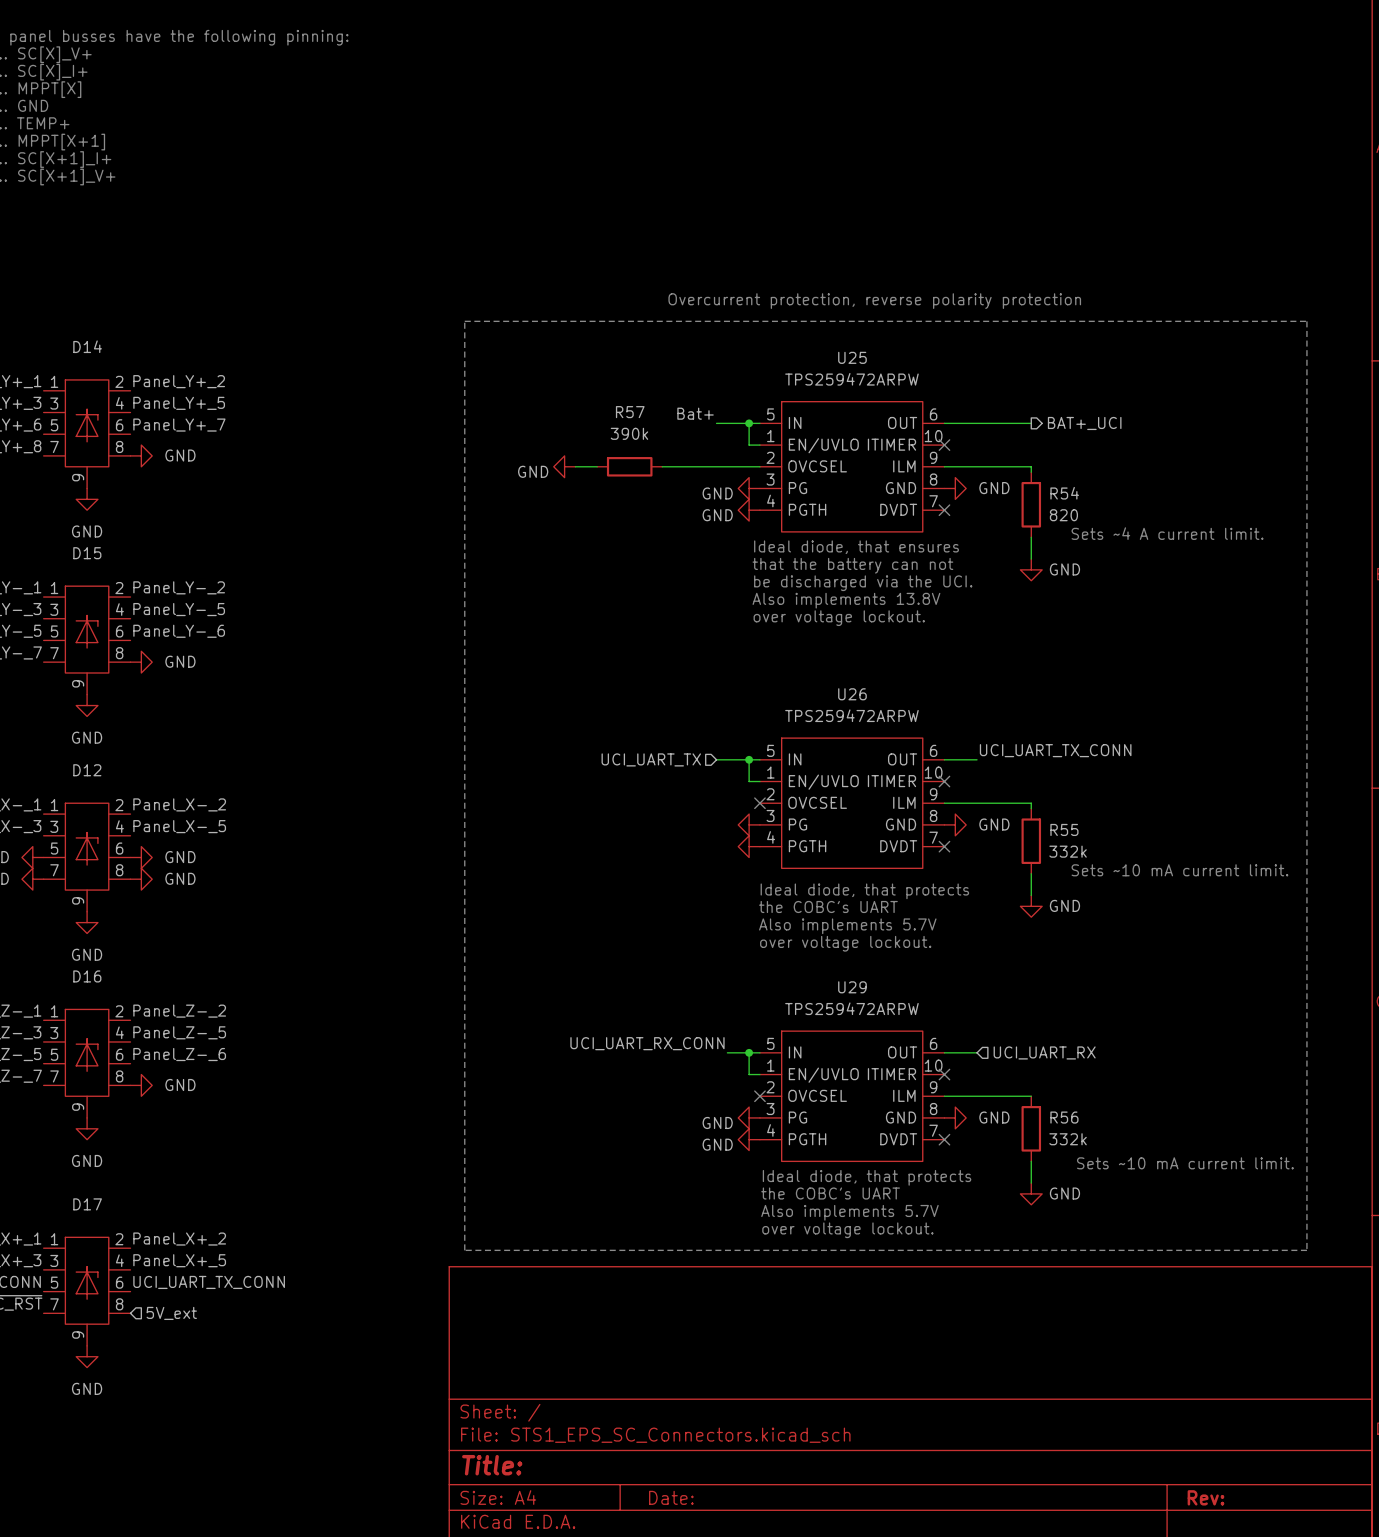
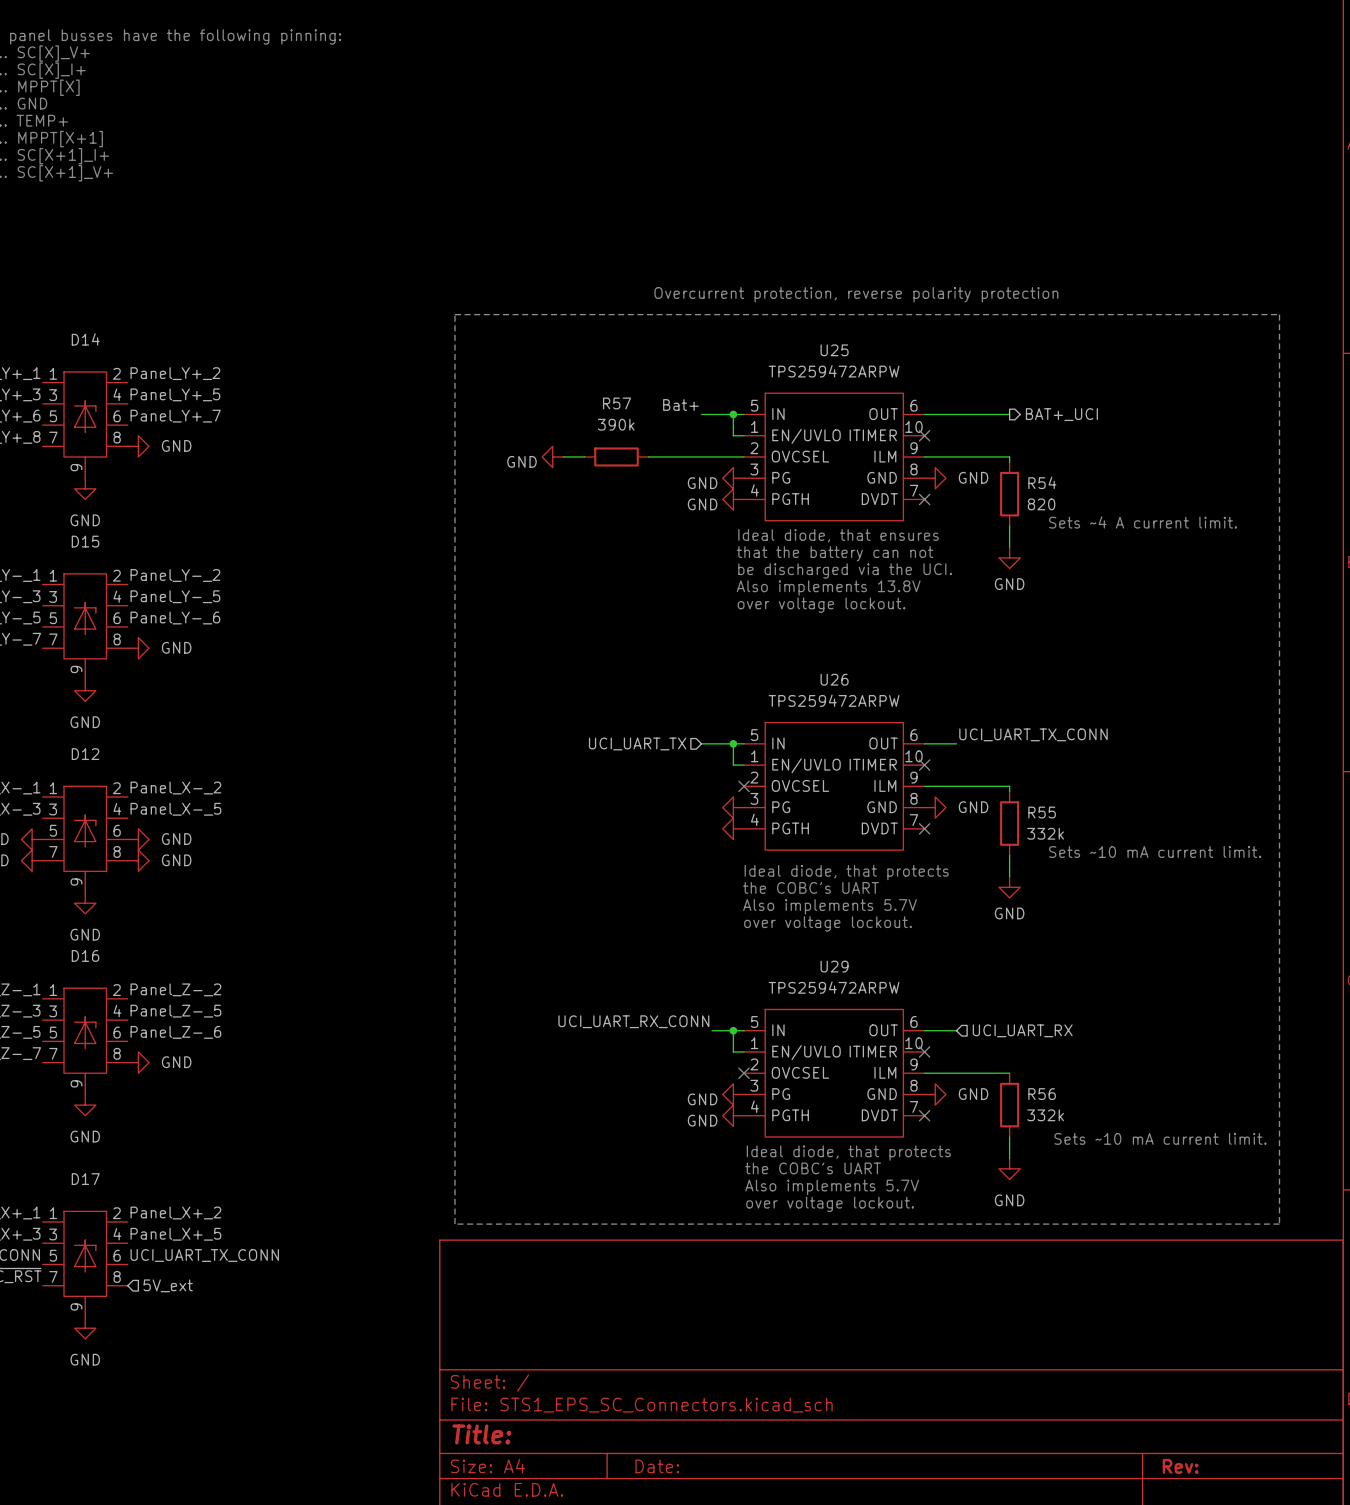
power symbol text position: GND (1064, 569) -> GND (1009, 584)
power symbol text position: GND (1064, 905) -> GND (1009, 913)
power symbol text position: GND (1064, 1193) -> GND (1009, 1200)

